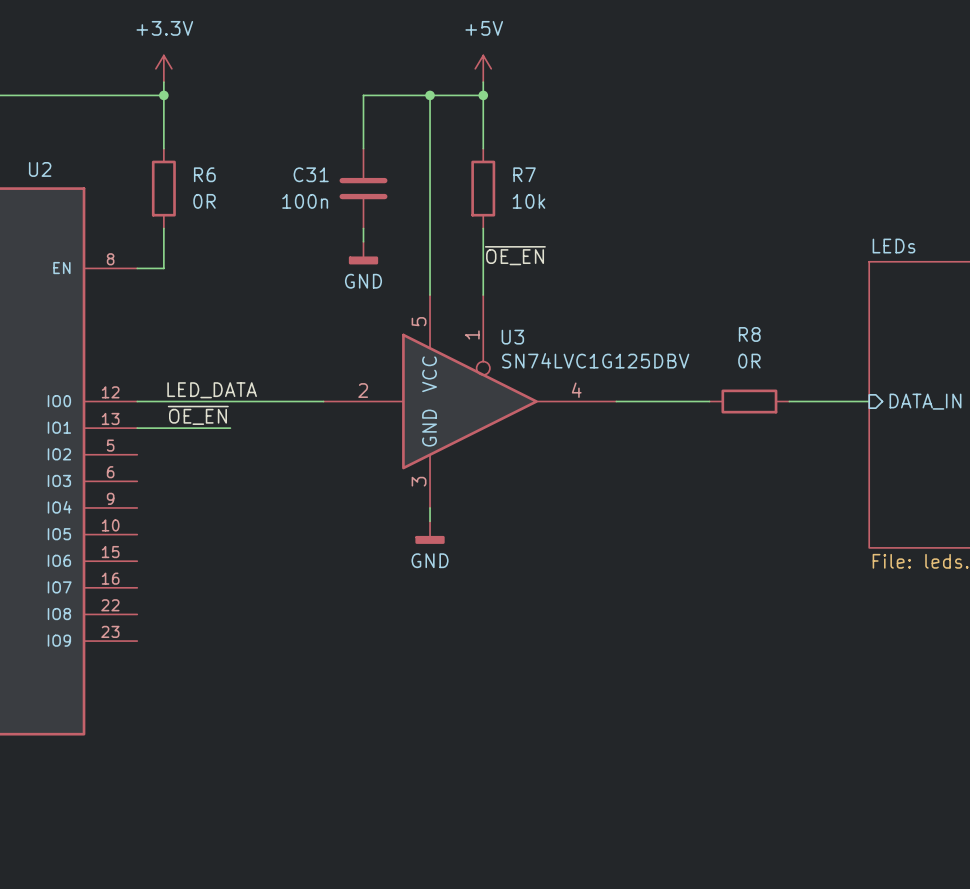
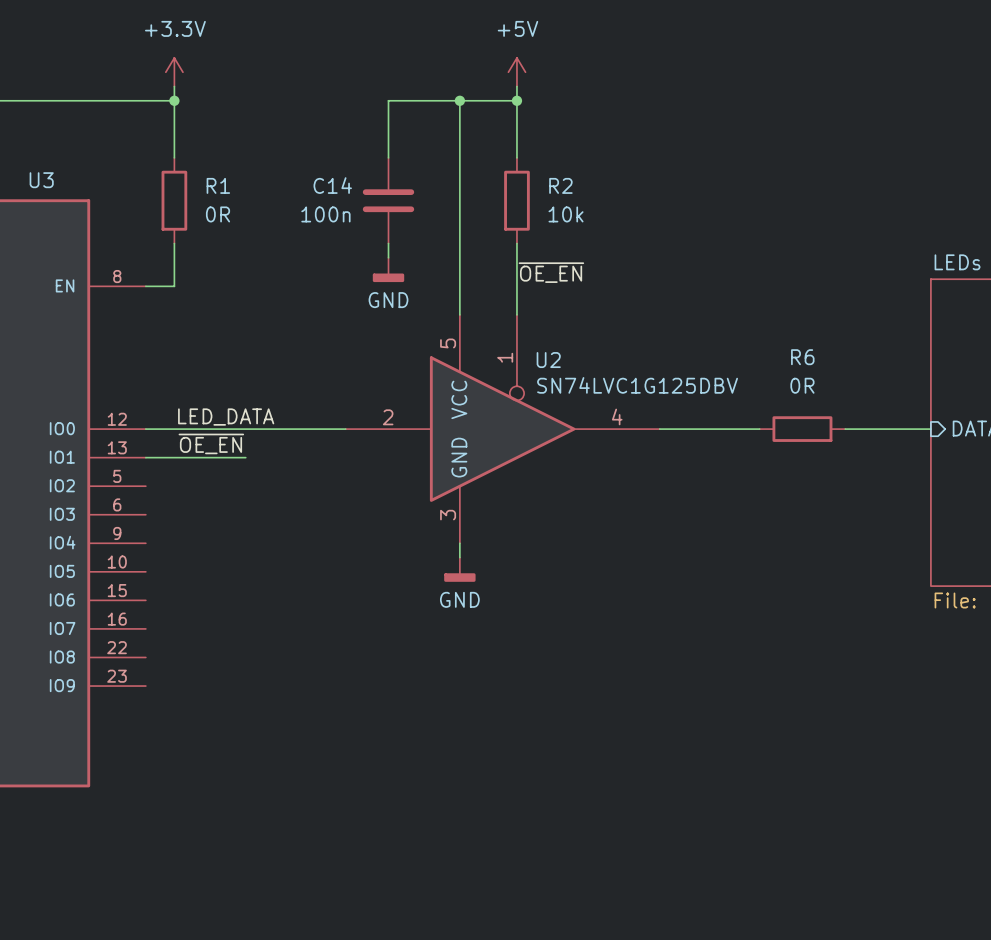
U2 name: U2 (40, 169) -> U3 (41, 180)
R6 name: R6 (204, 174) -> R1 (218, 185)
C31 name: C31 (311, 174) -> C14 (332, 185)
R7 name: R7 (524, 174) -> R2 (560, 185)
R8 name: R8 (749, 334) -> R6 (802, 357)
U3 name: U3 (512, 337) -> U2 (548, 360)

